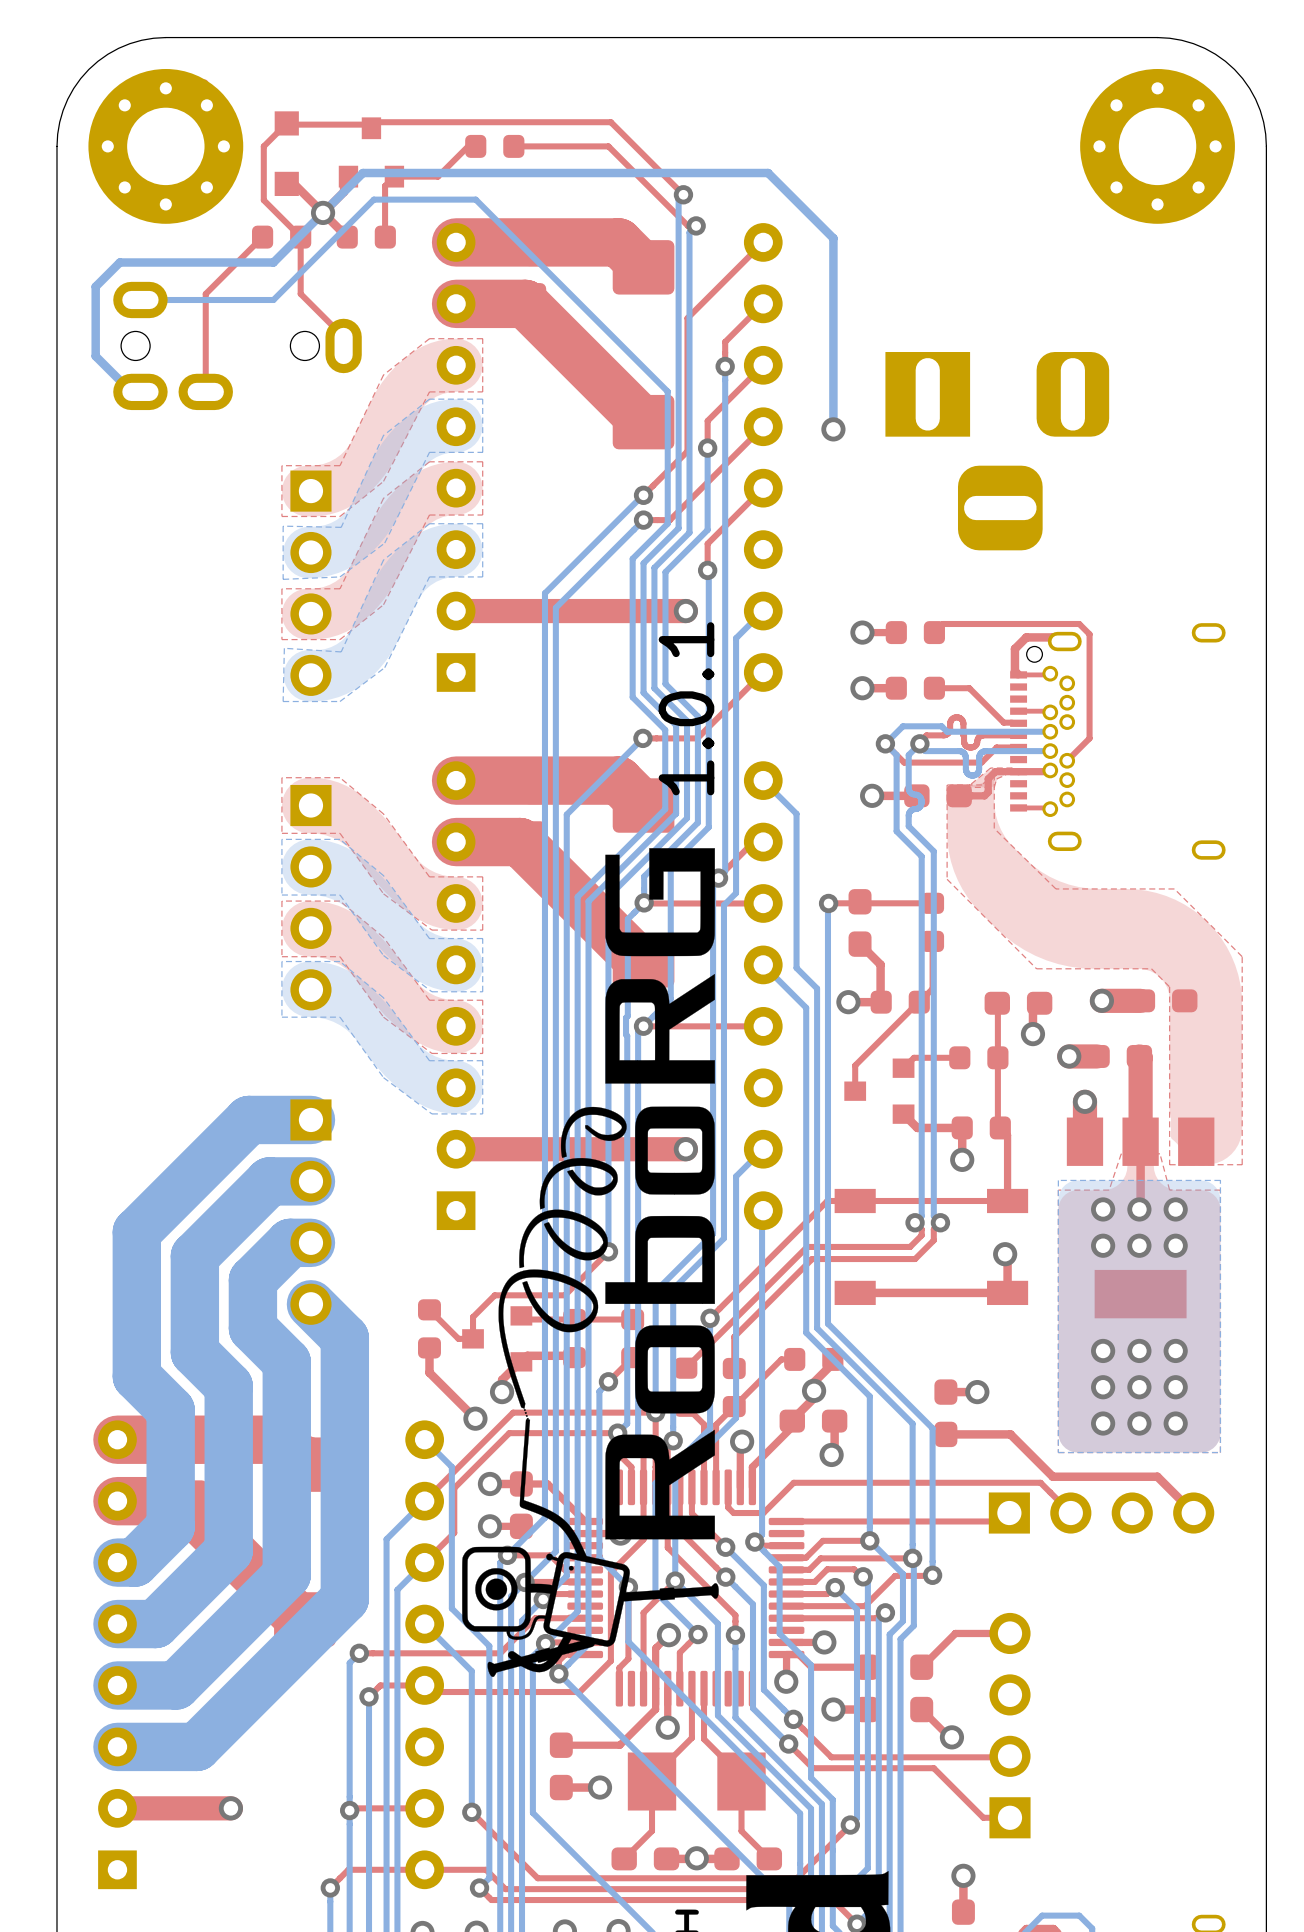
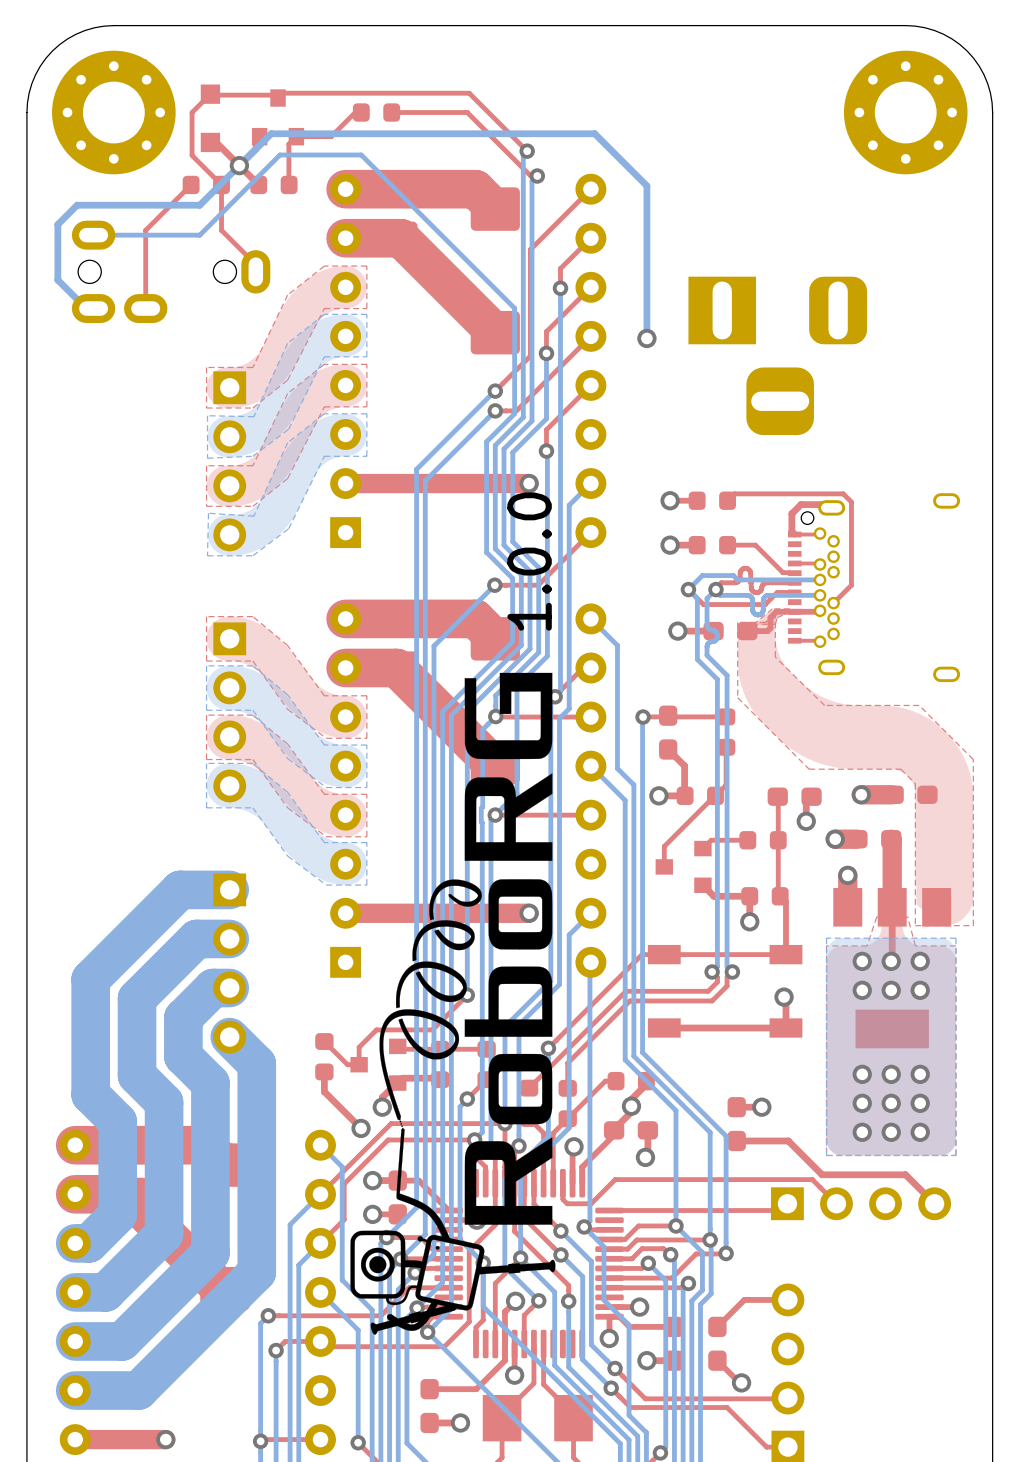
text: 1.0.1 (686, 708) -> 1.0.0 (529, 561)

